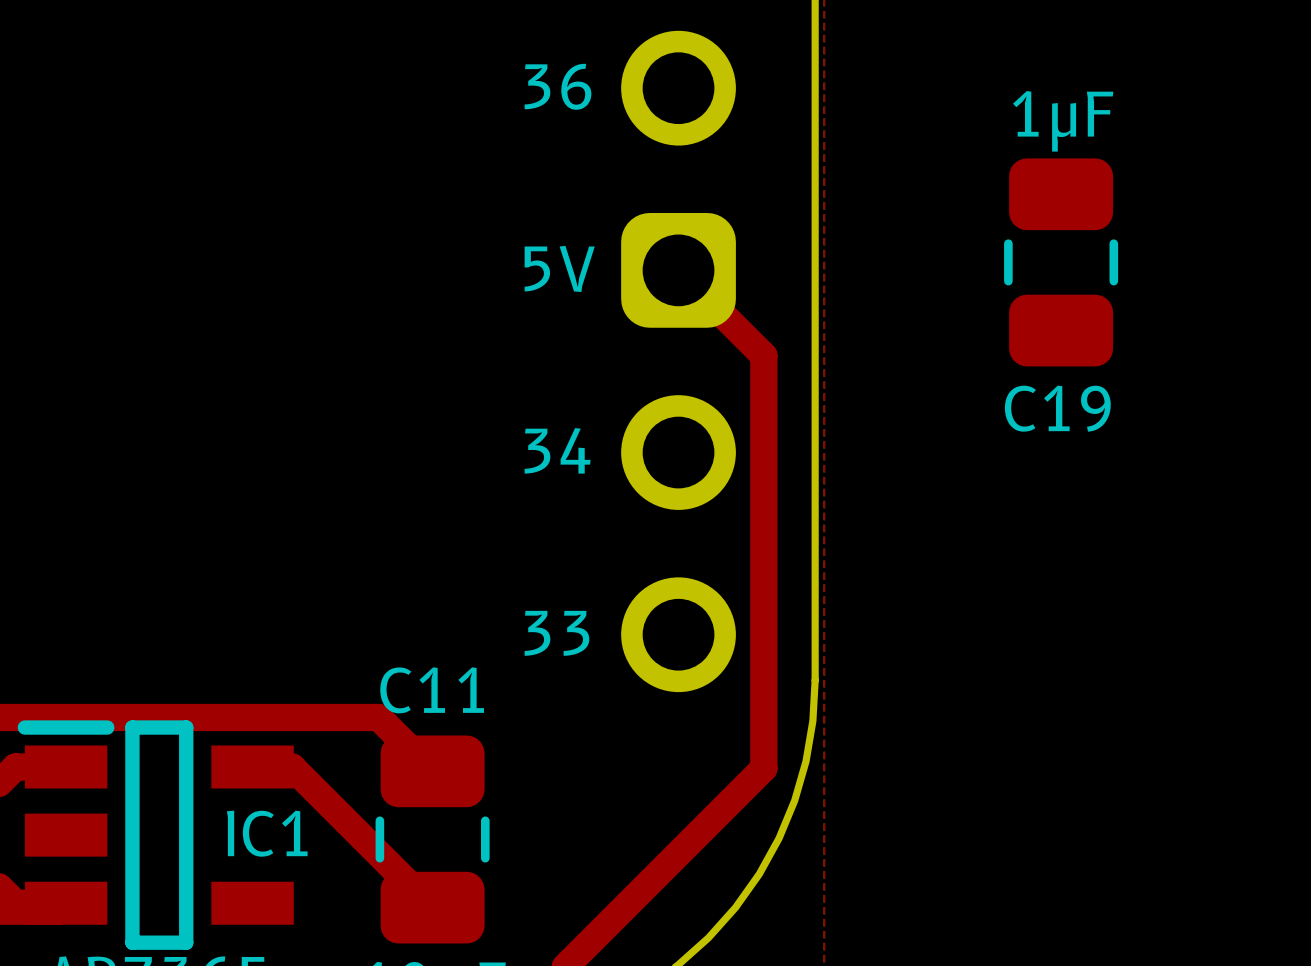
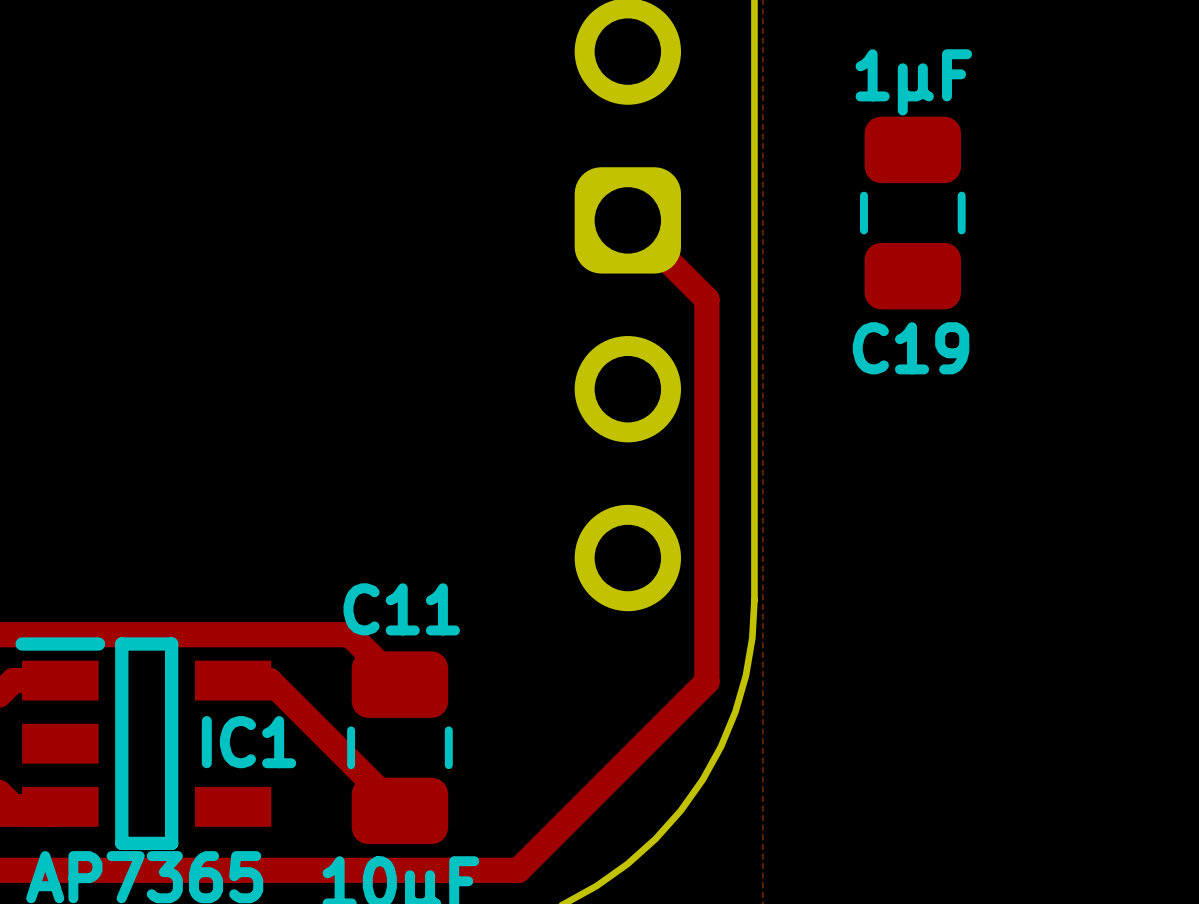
text: 36 (558, 86) -> none
C19 position: (1061, 262) -> (912, 213)
text: 5V (559, 268) -> none
text: 34 (557, 450) -> none
text: 33 (556, 633) -> none

